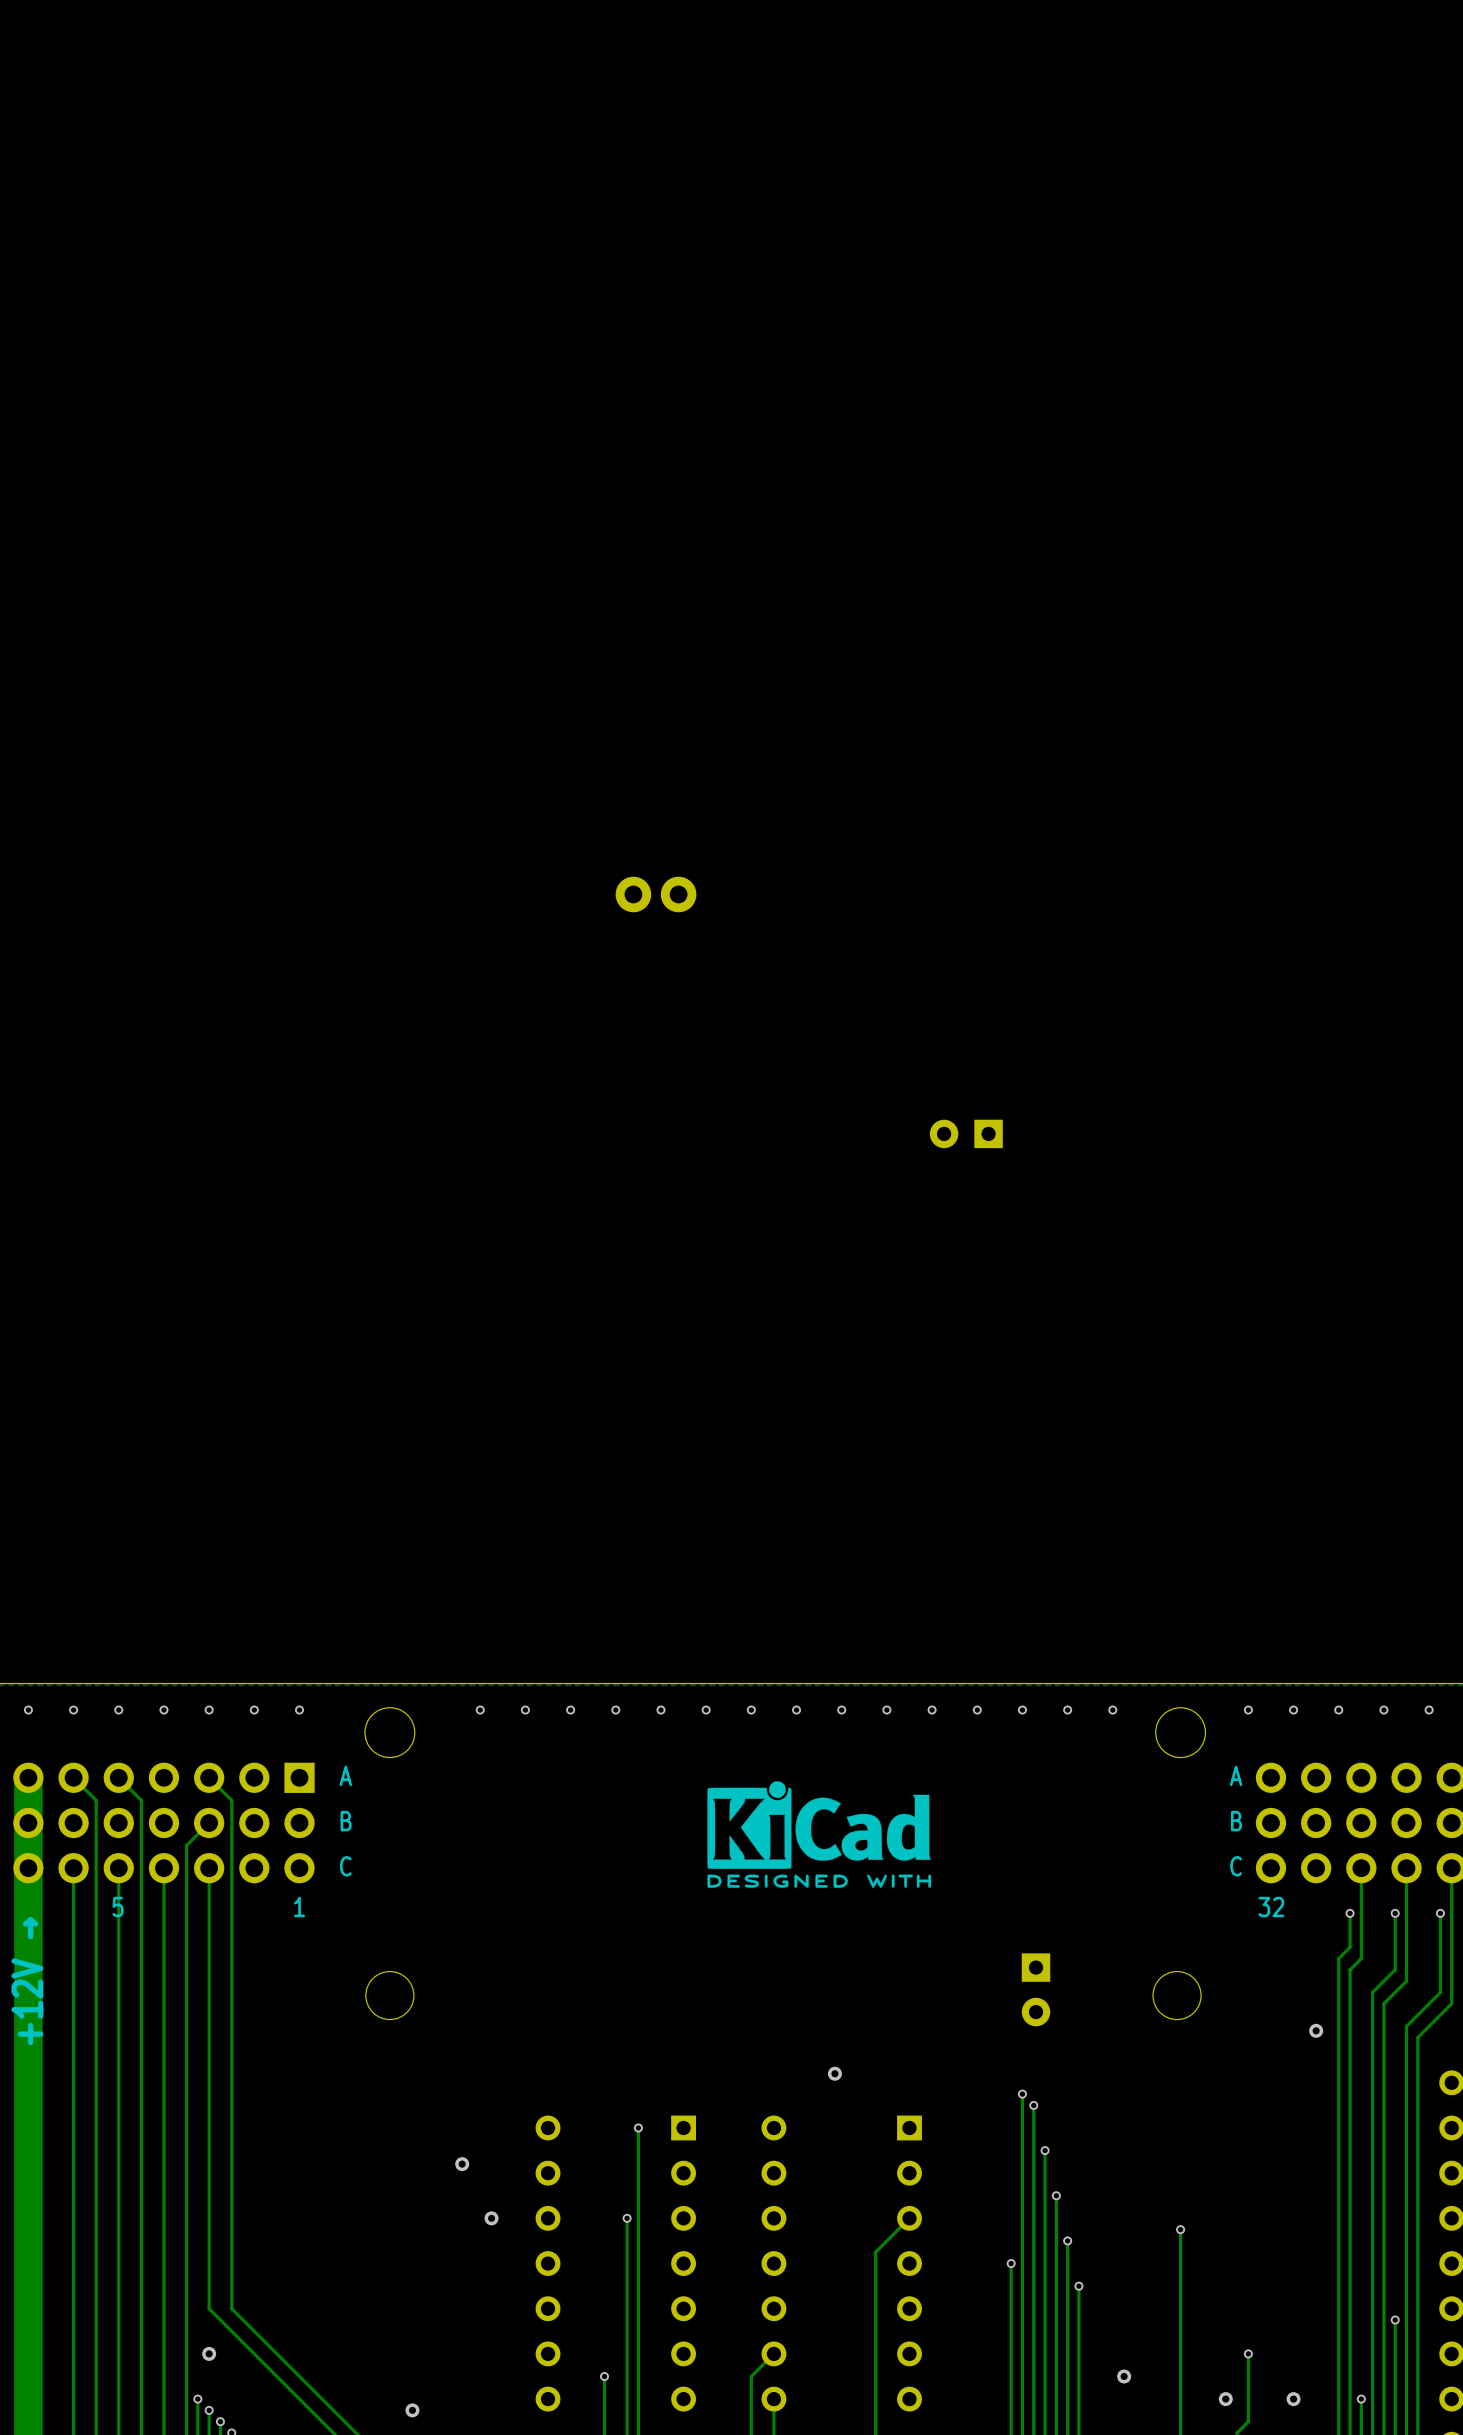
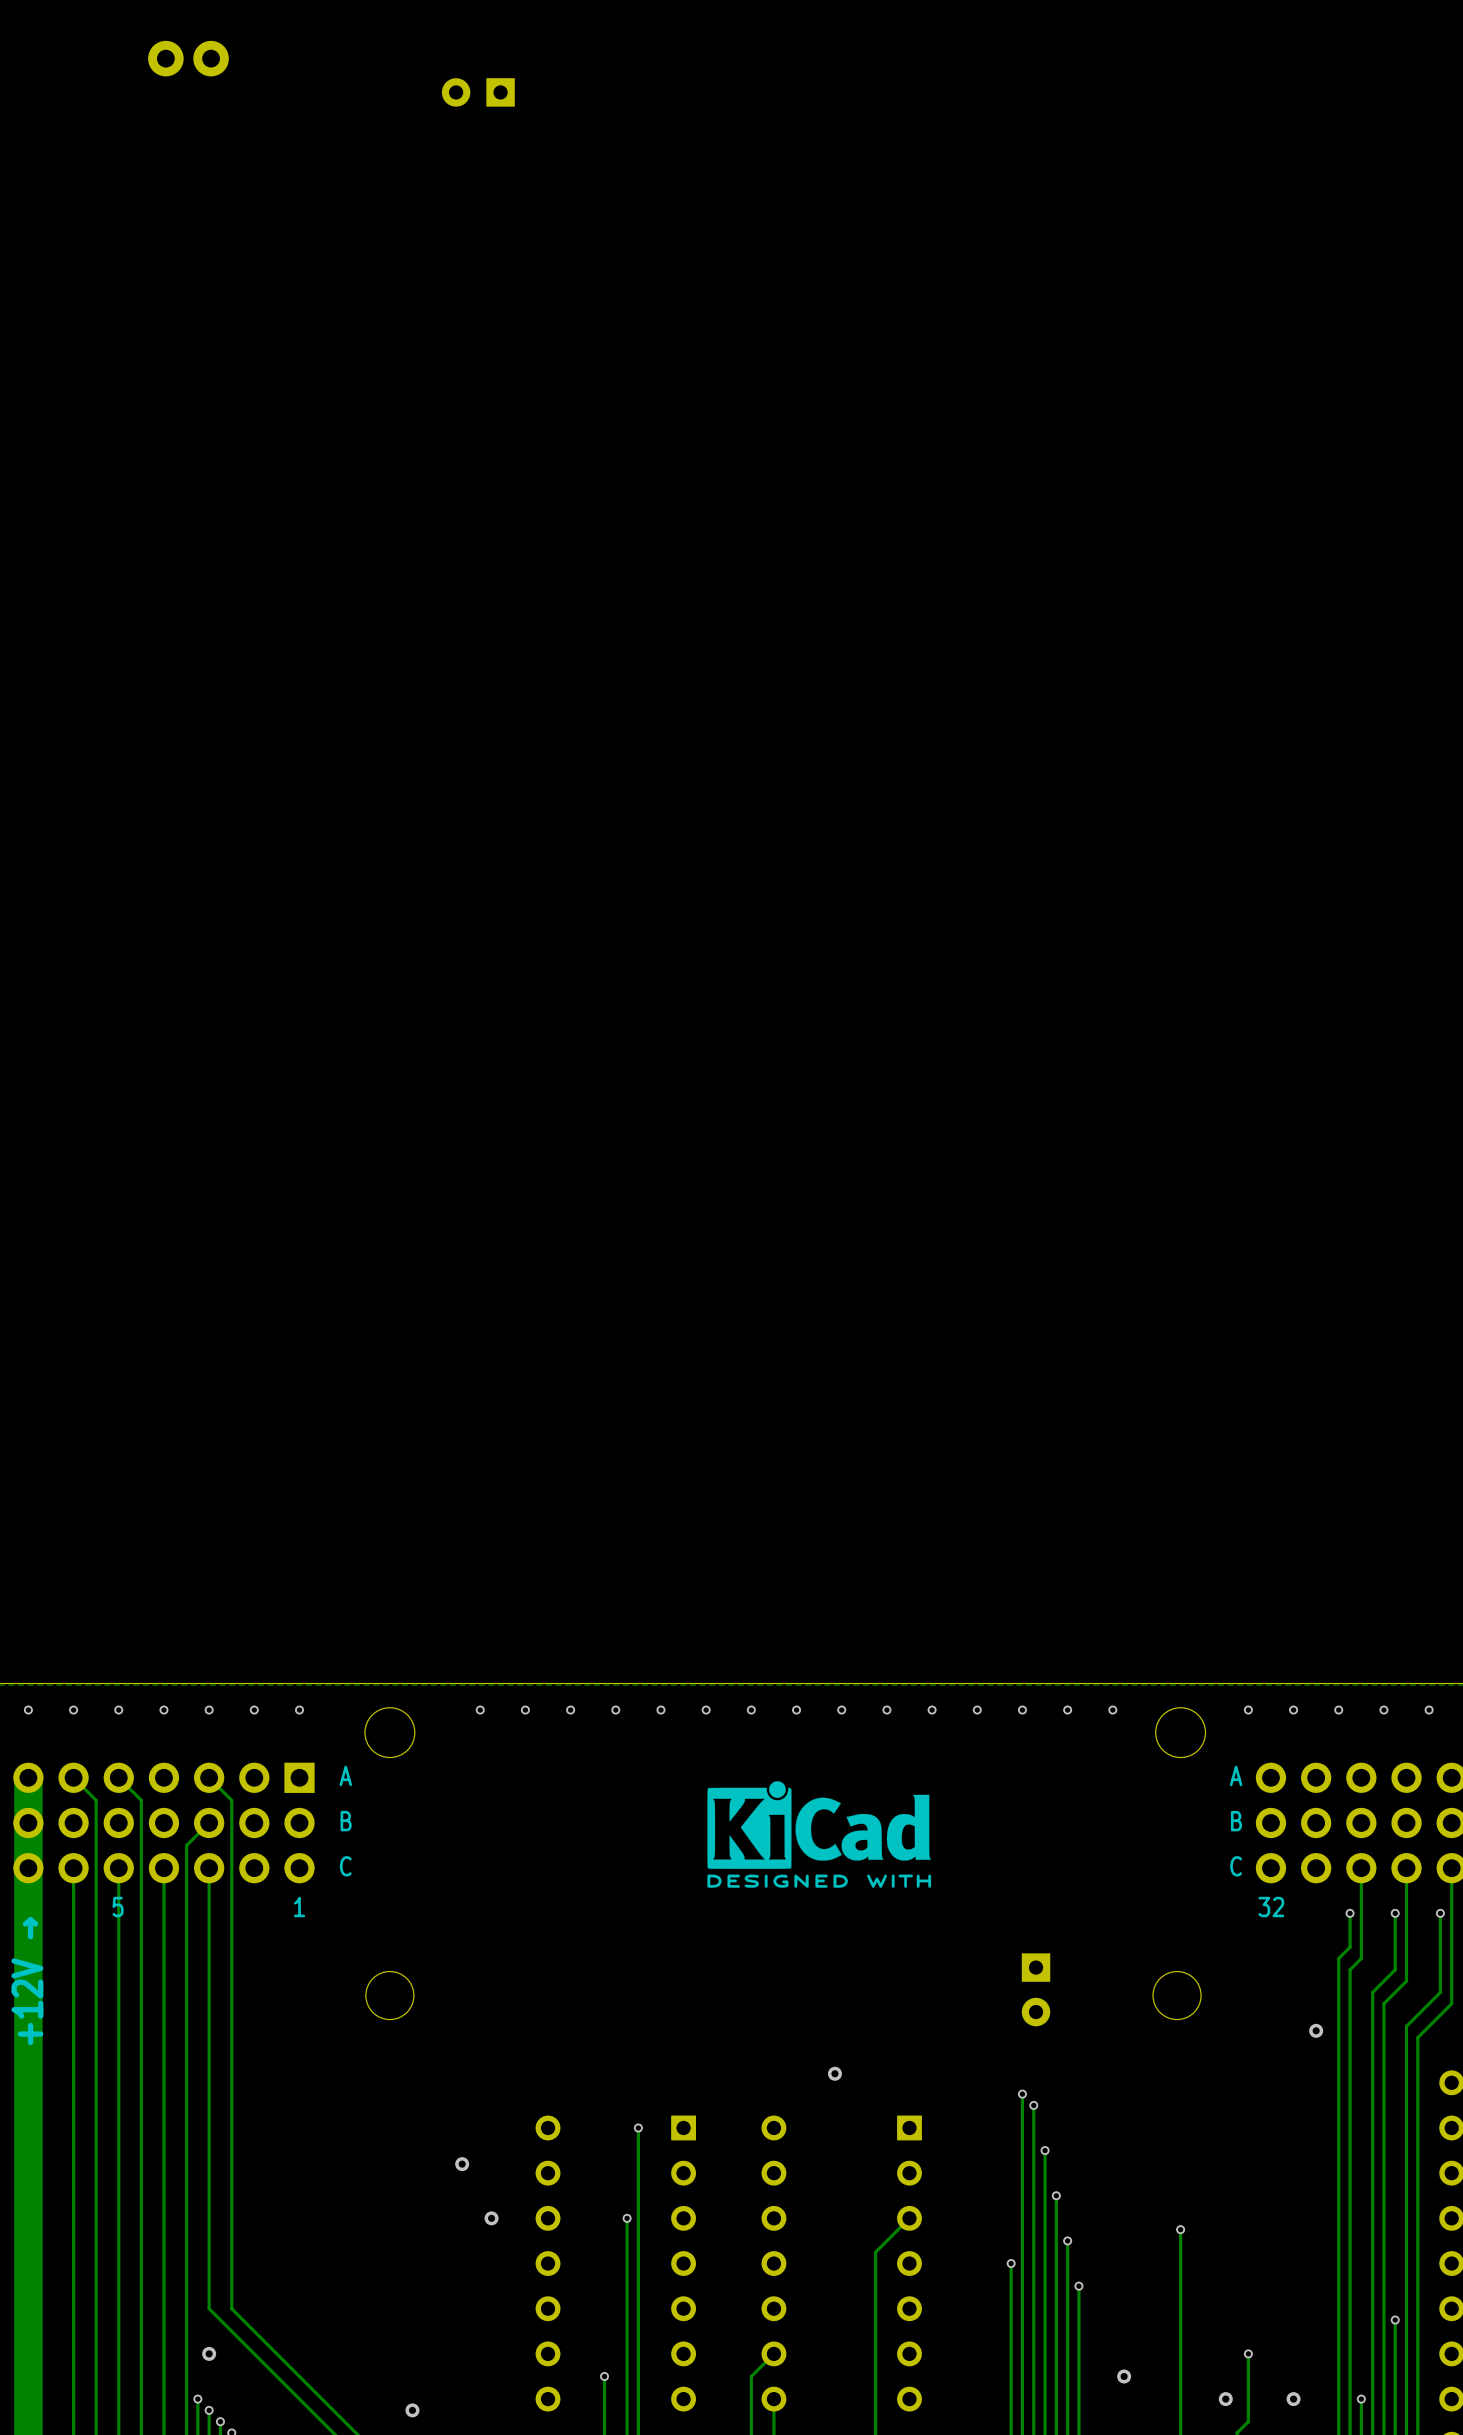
part: none -> (188, 58)
part: none -> (478, 92)
part: (656, 894) -> none
part: (966, 1133) -> none

